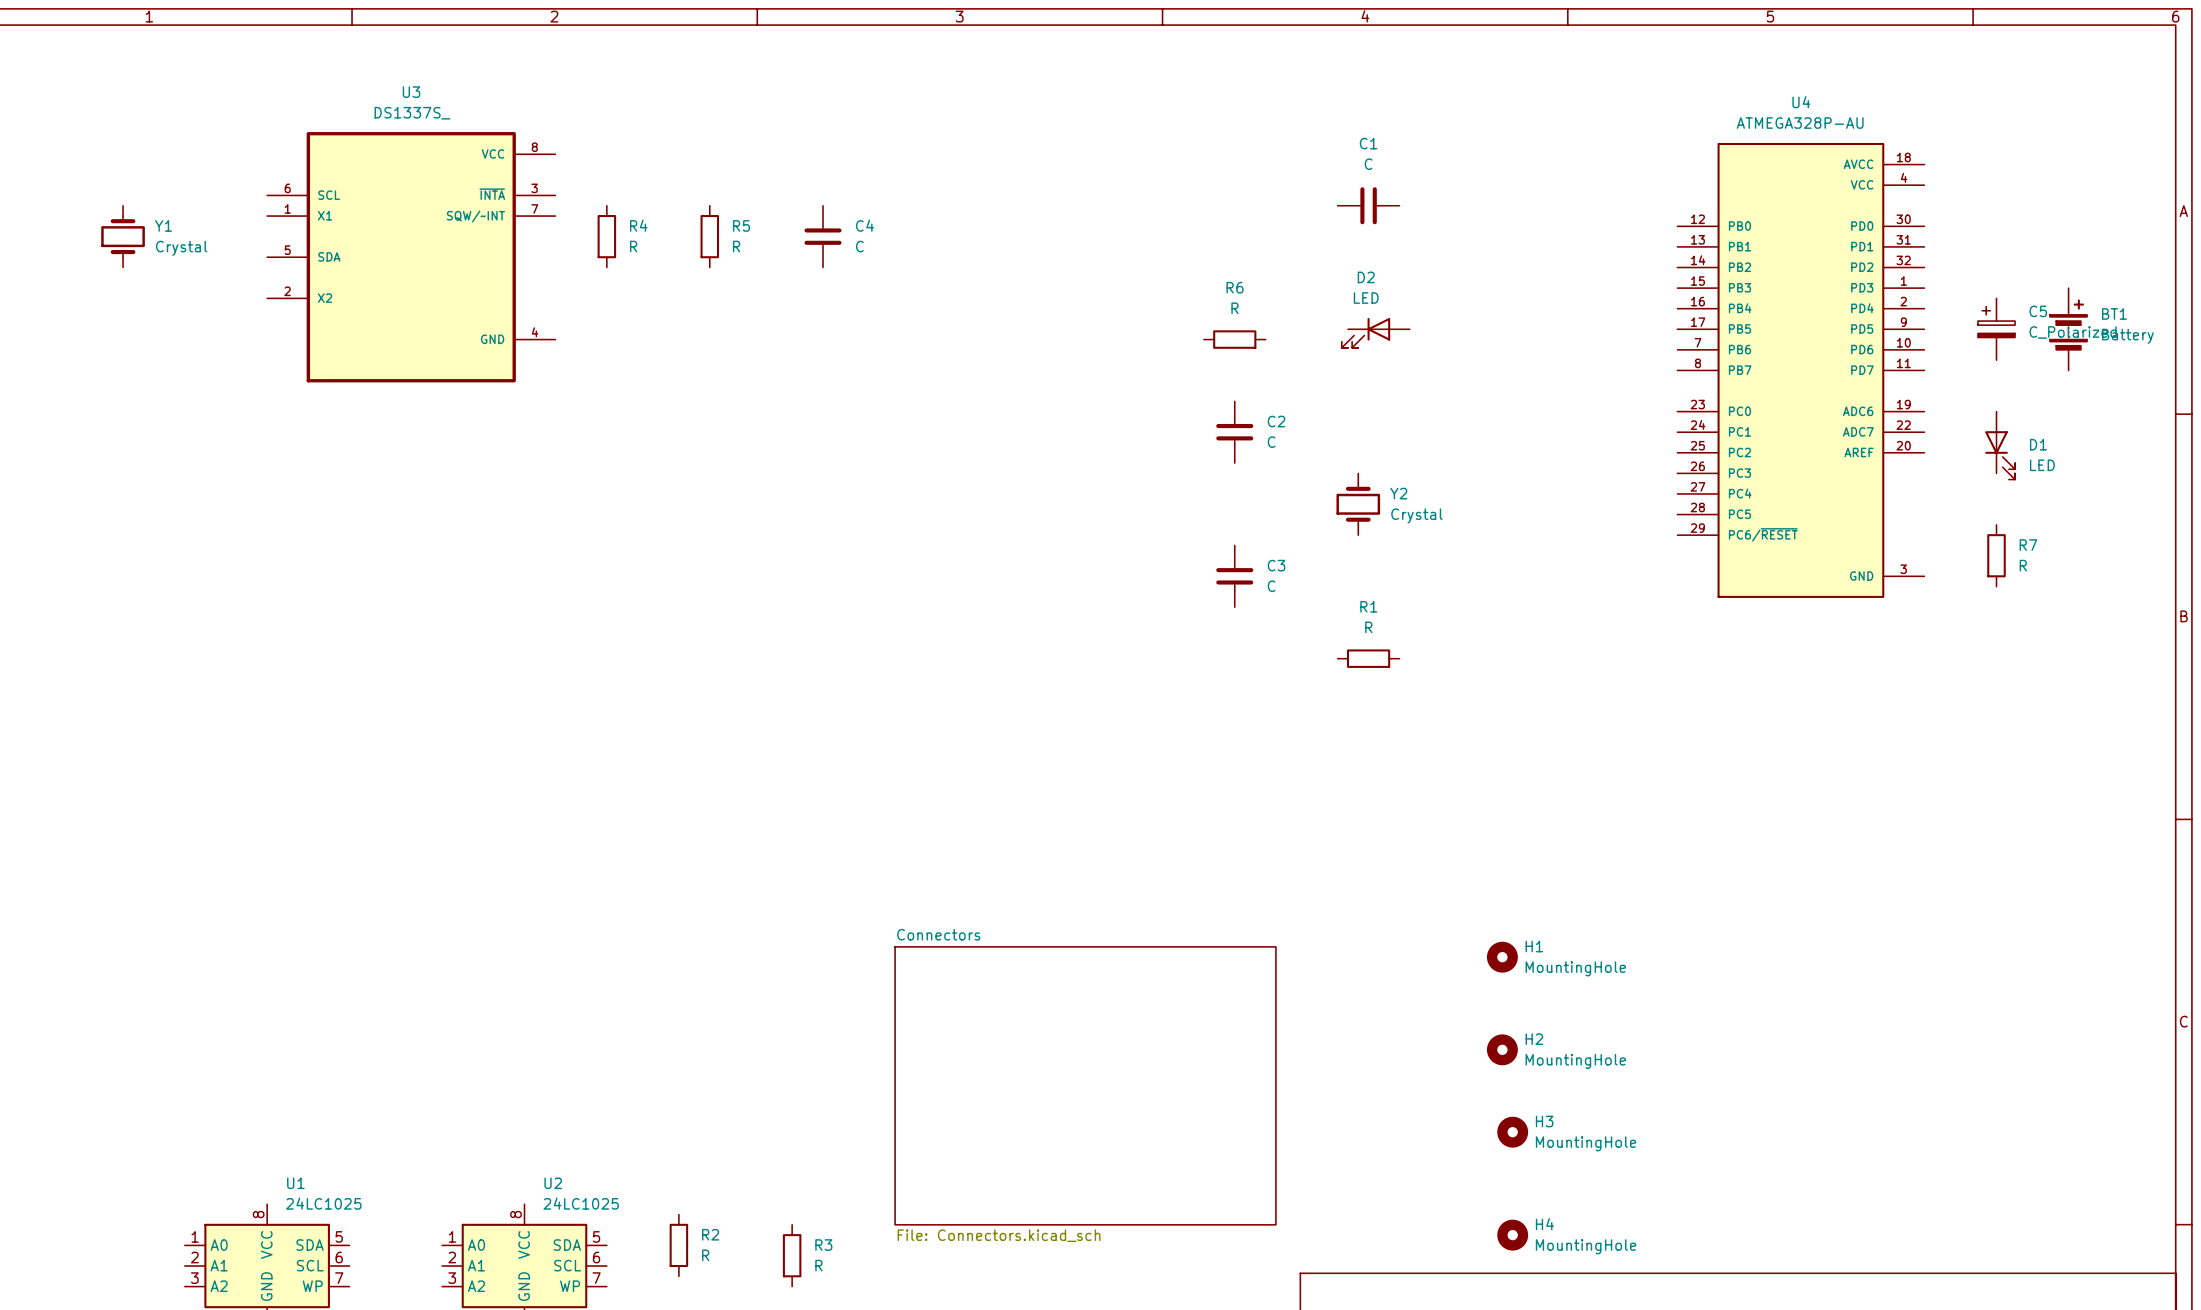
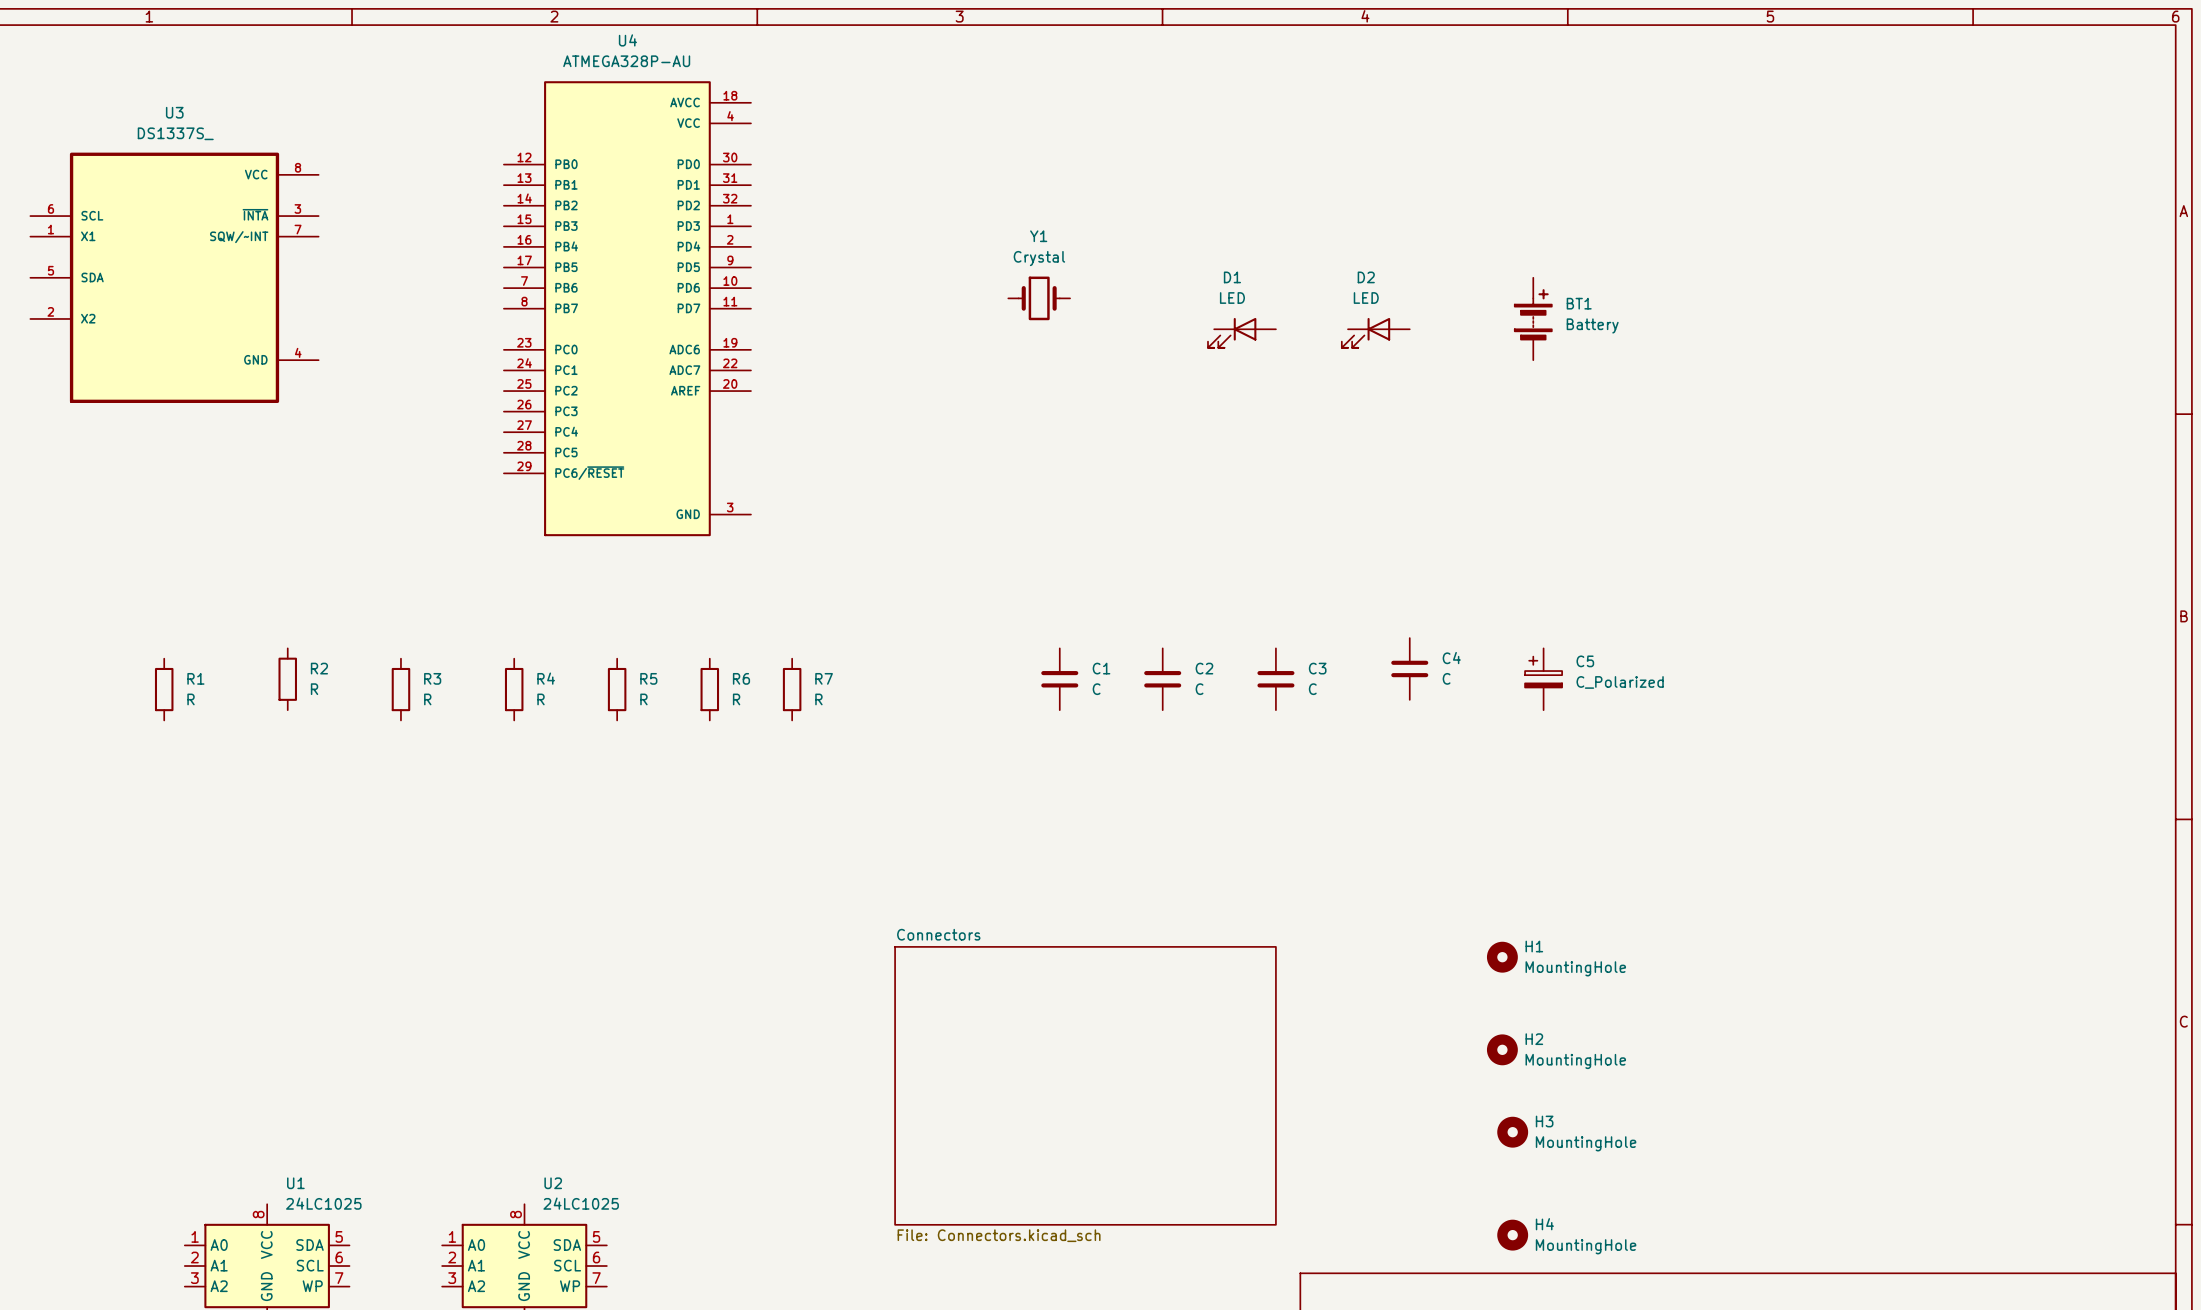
C1 name position: C1 (1368, 143) -> C1 (1101, 668)
C1 rotation: 0° (1368, 205) -> 90° clockwise (1059, 679)
C1 position: (1368, 205) -> (1059, 679)
Y1 name position: Y1 (163, 225) -> Y1 (1038, 236)
Y1 rotation: 0° (123, 236) -> 90° clockwise (1039, 298)
Y1 position: (123, 236) -> (1039, 298)
R4 position: (606, 236) -> (514, 689)
R5 position: (709, 236) -> (617, 689)
C4 position: (823, 236) -> (1409, 668)
Y1 value position: Crystal (181, 248) -> Crystal (1039, 258)
U3 position: (411, 257) -> (174, 277)
R6 name position: R6 (1235, 287) -> R6 (741, 678)
C5 position: (1996, 329) -> (1543, 679)
BT1 position: (2068, 329) -> (1533, 318)
R6 rotation: 0° (1234, 339) -> 90° clockwise (709, 689)
R6 position: (1234, 339) -> (709, 689)
U4 position: (1800, 370) -> (627, 308)
C2 position: (1234, 432) -> (1162, 679)
D1 name position: D1 (2038, 444) -> D1 (1232, 277)
D1 position: (2000, 445) -> (1241, 332)
D1 rotation: 0° (2000, 455) -> 90° clockwise (1232, 332)
D1 value position: LED (2042, 465) -> LED (1232, 298)
Y2: Crystal (1358, 504) -> none
R7 position: (1996, 555) -> (792, 689)
C3 position: (1234, 576) -> (1275, 679)
R1 name position: R1 (1368, 606) -> R1 (195, 678)
R1 rotation: 0° (1368, 658) -> 90° clockwise (164, 689)
R1 position: (1368, 658) -> (164, 689)
R2 position: (678, 1245) -> (287, 679)
R3 position: (792, 1255) -> (400, 689)

